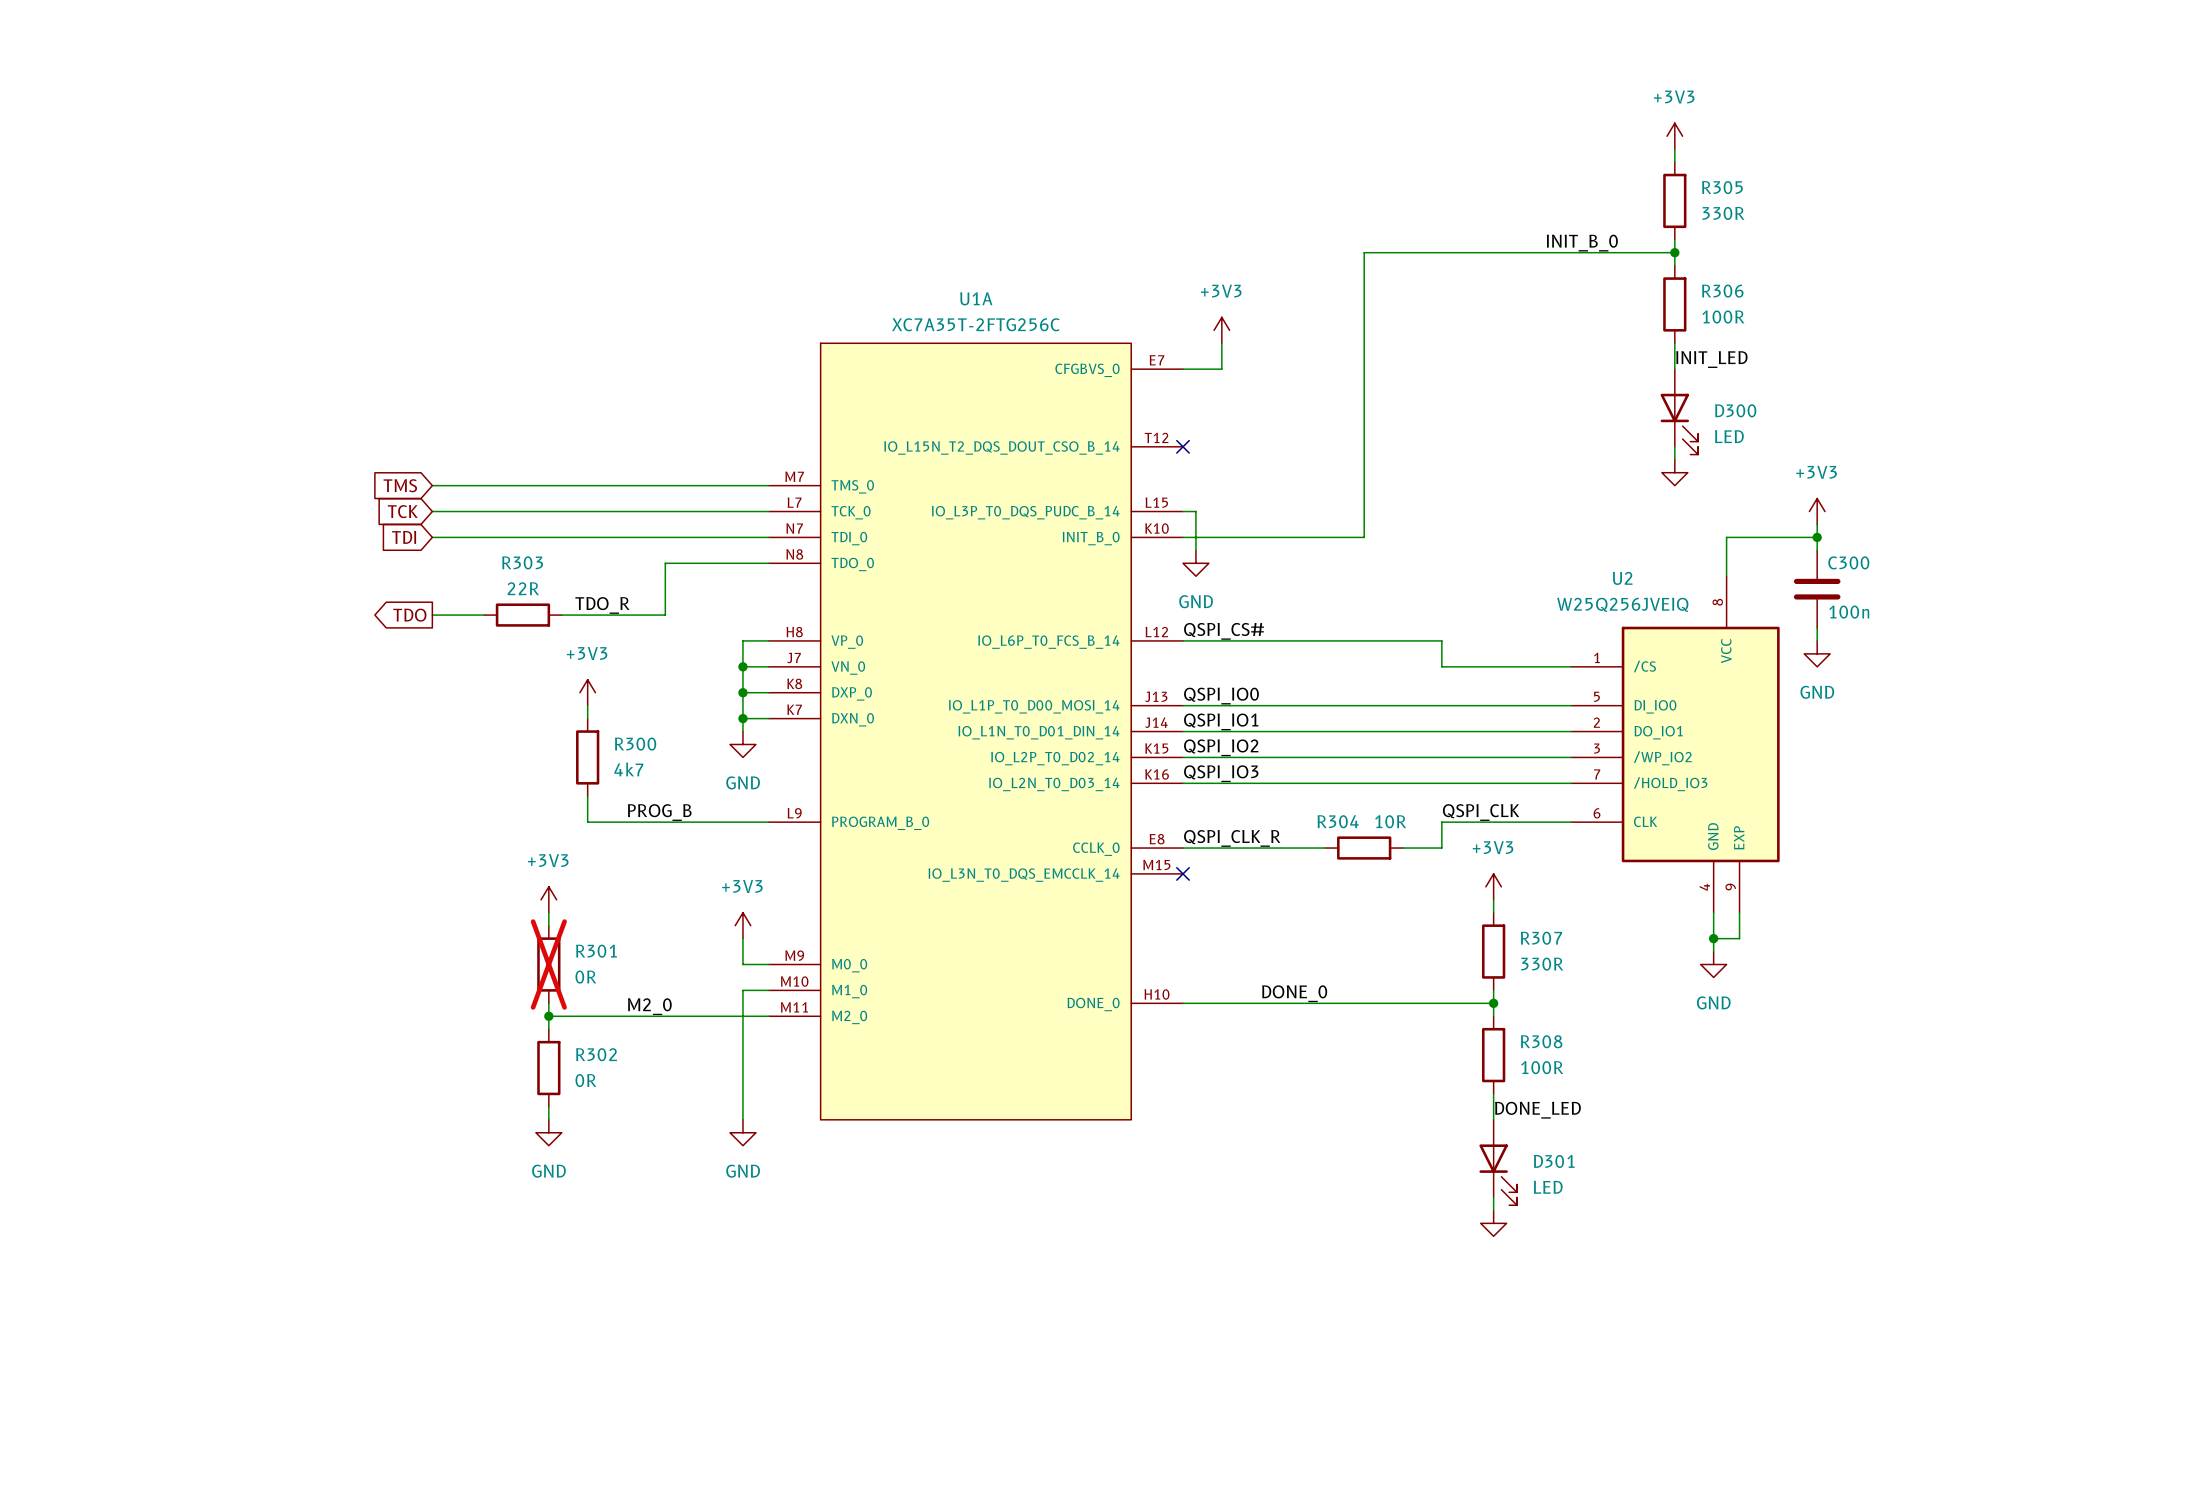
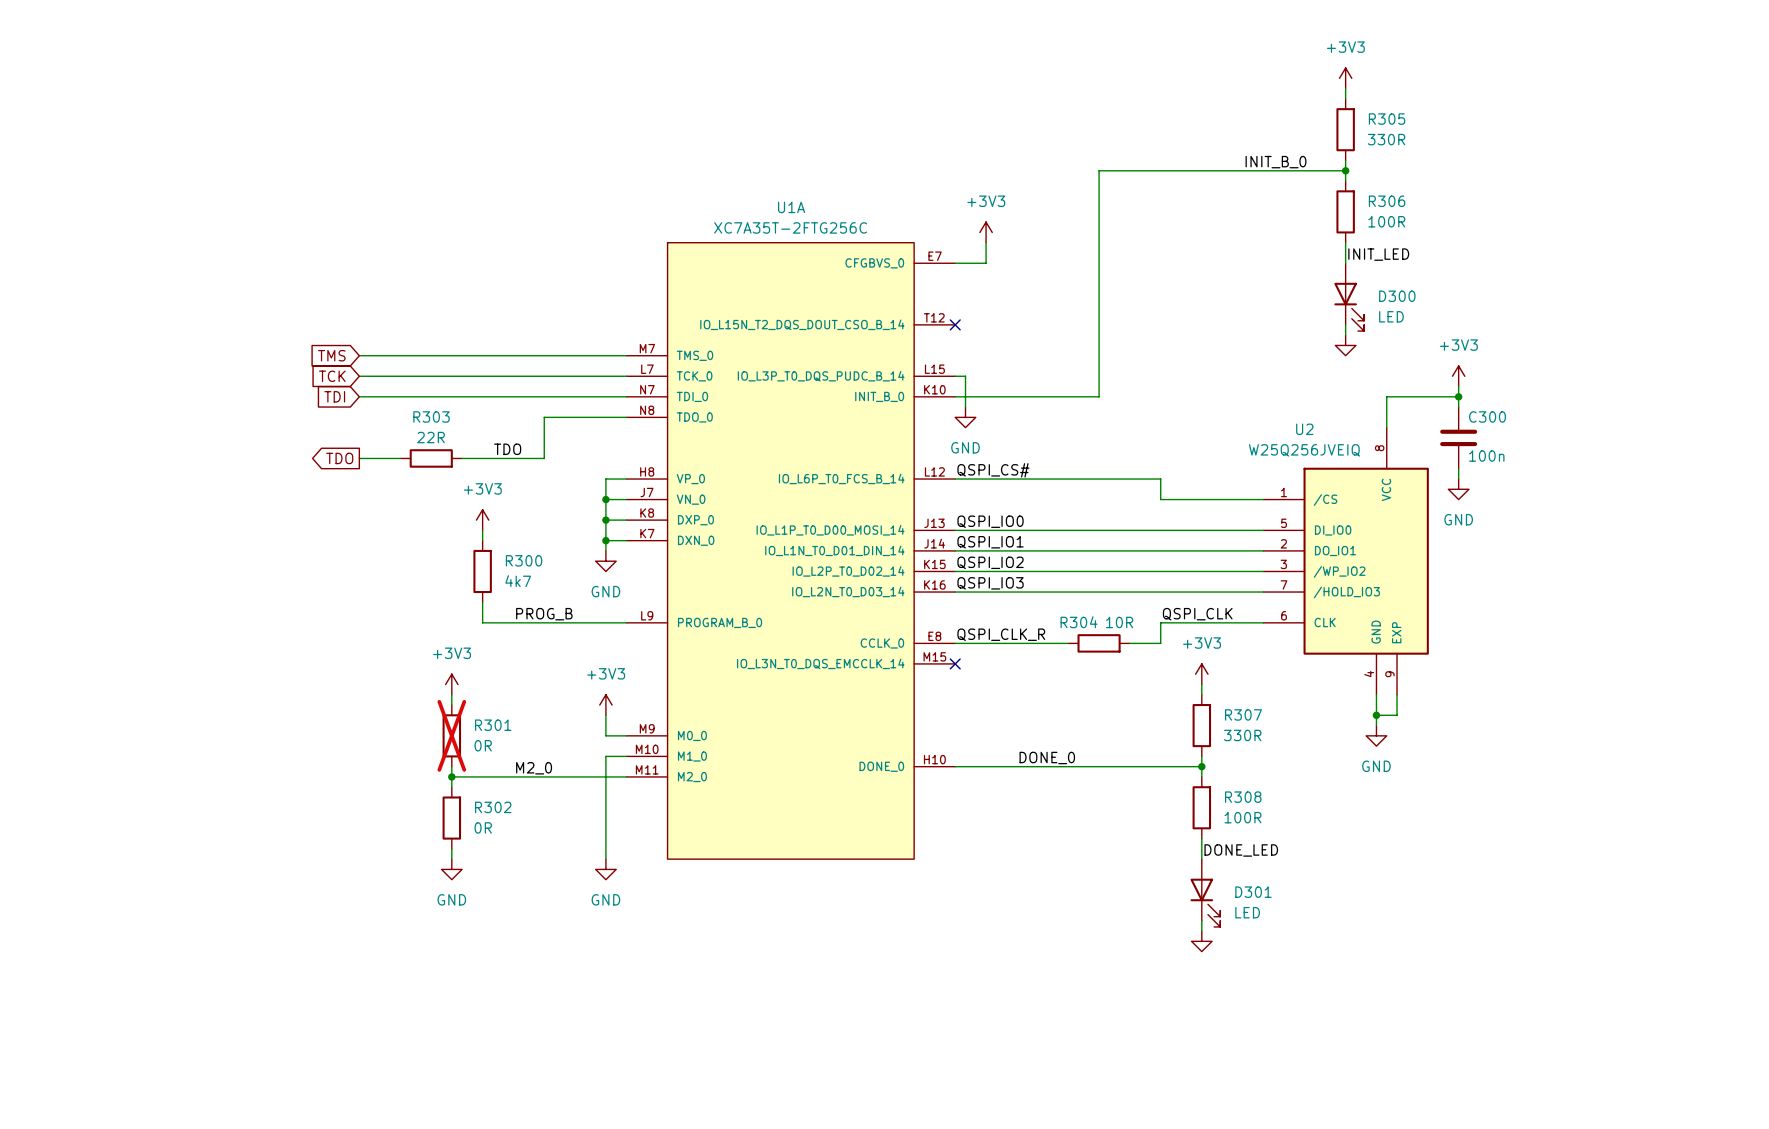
label: TDO_R (602, 605) -> TDO (507, 449)

